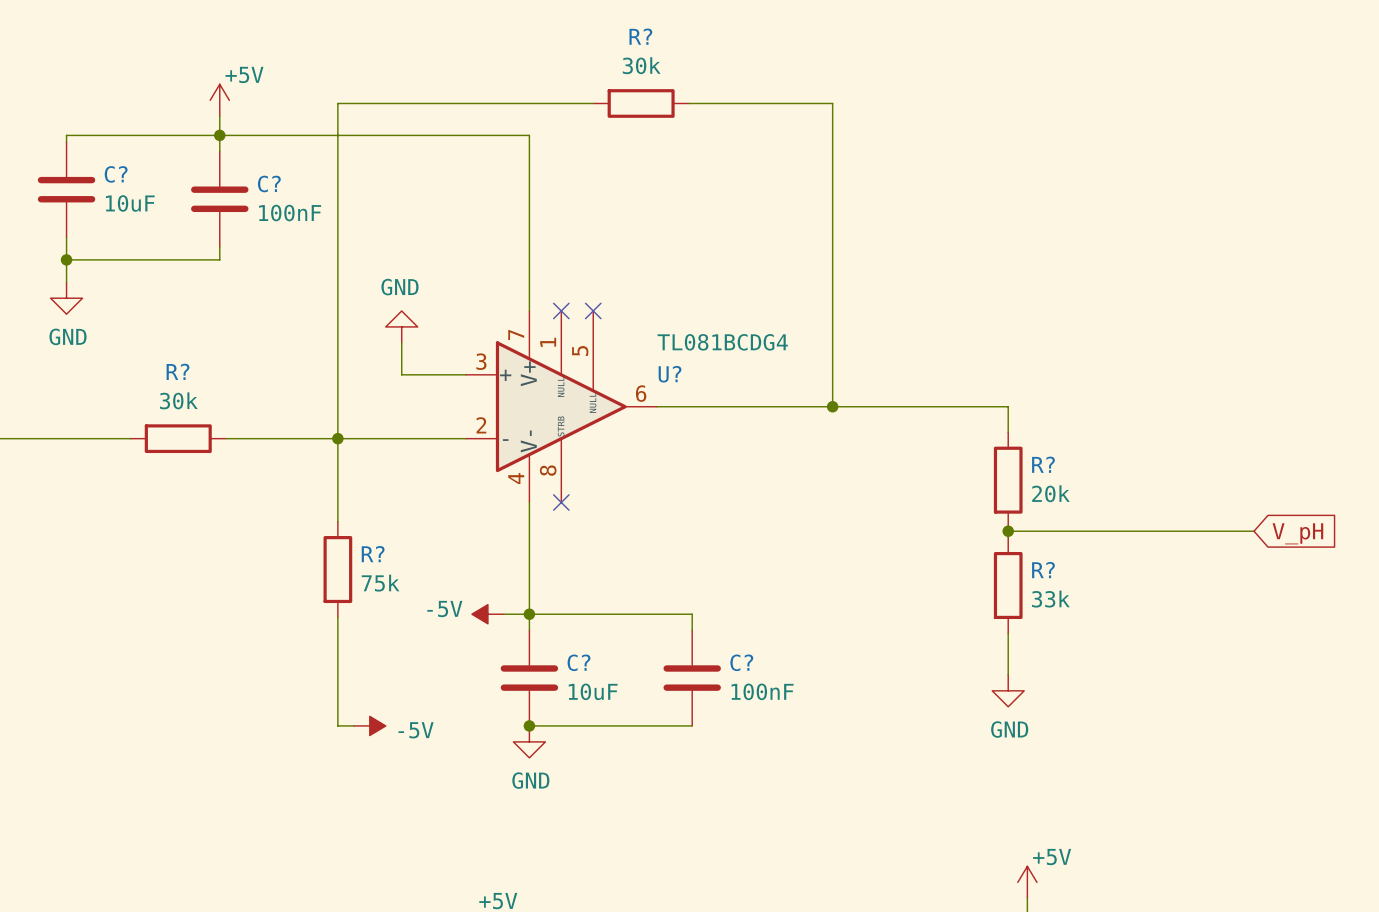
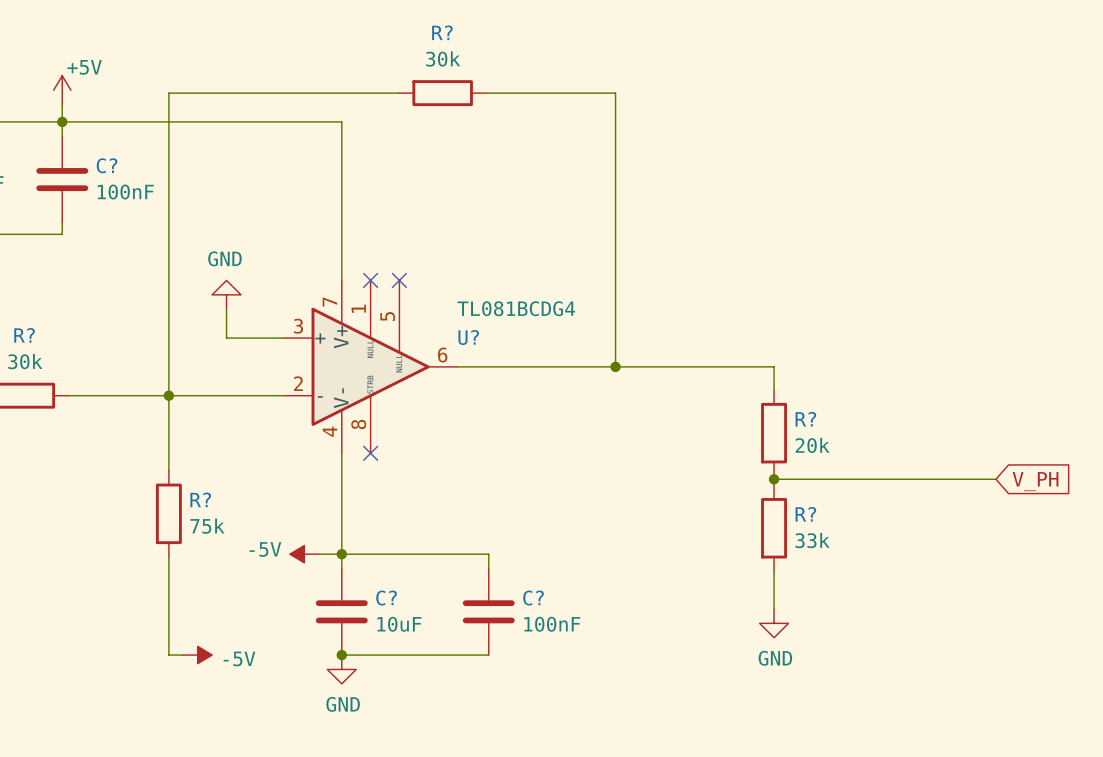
global label: V_pH (1297, 533) -> V_PH (1035, 481)

